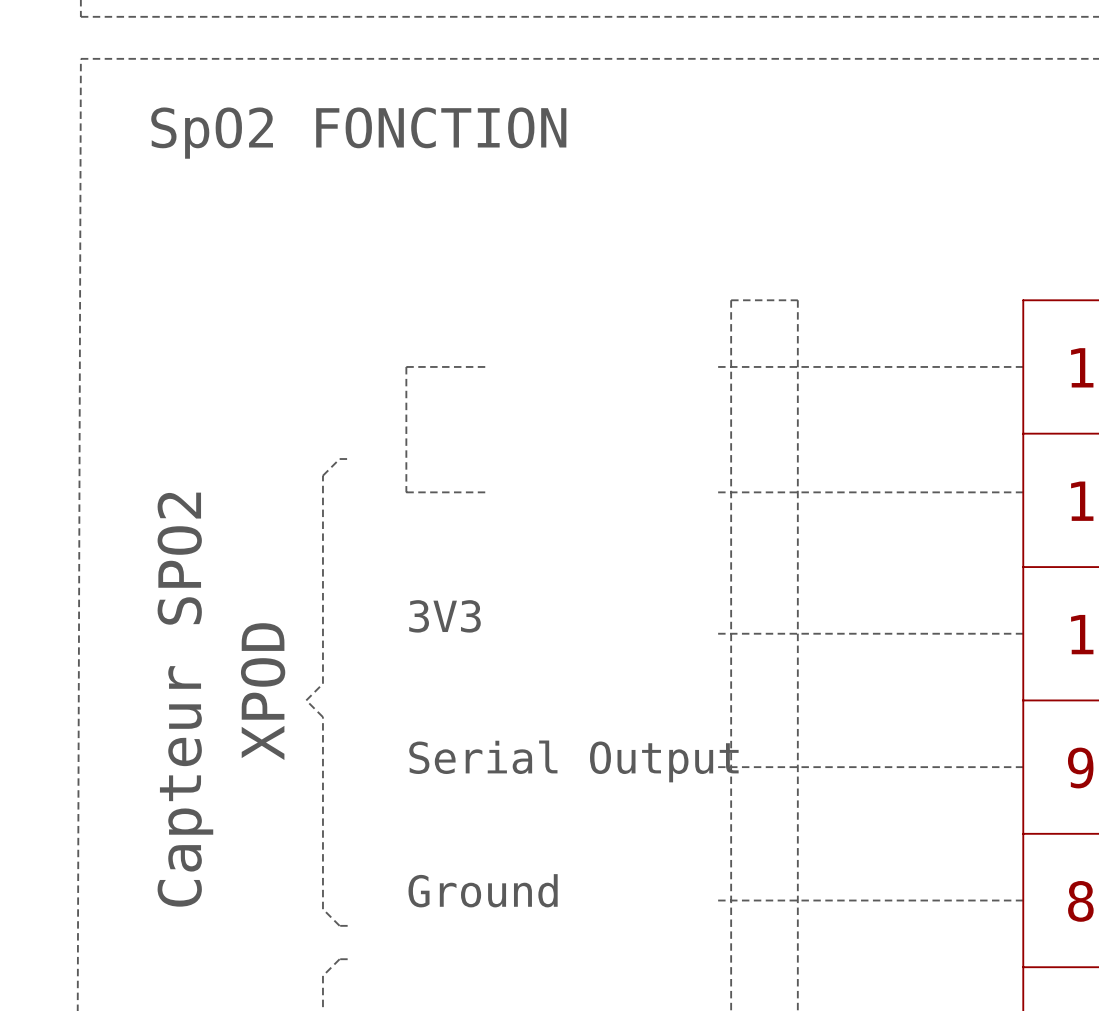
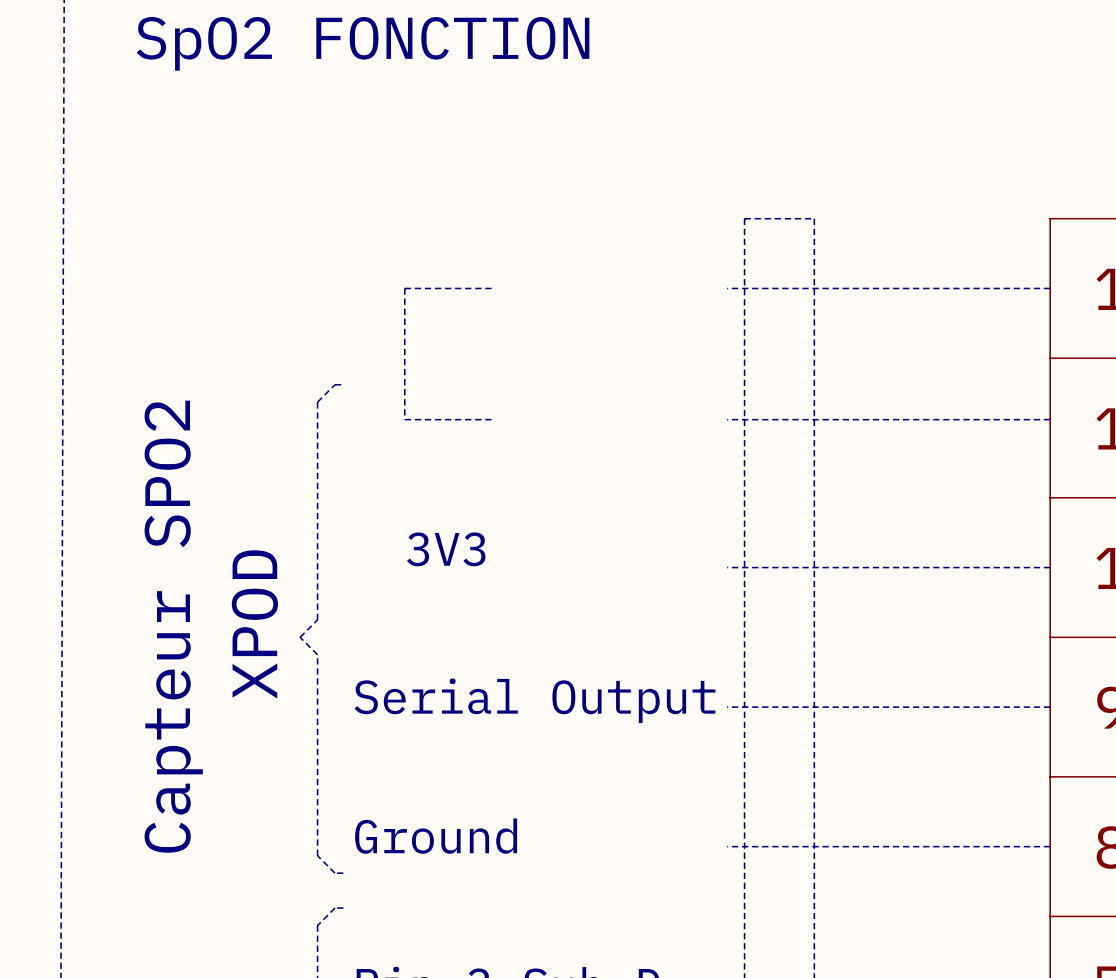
text position: Serial Output (573, 761) -> Serial Output (535, 700)
text position: Ground (483, 890) -> Ground (436, 836)

